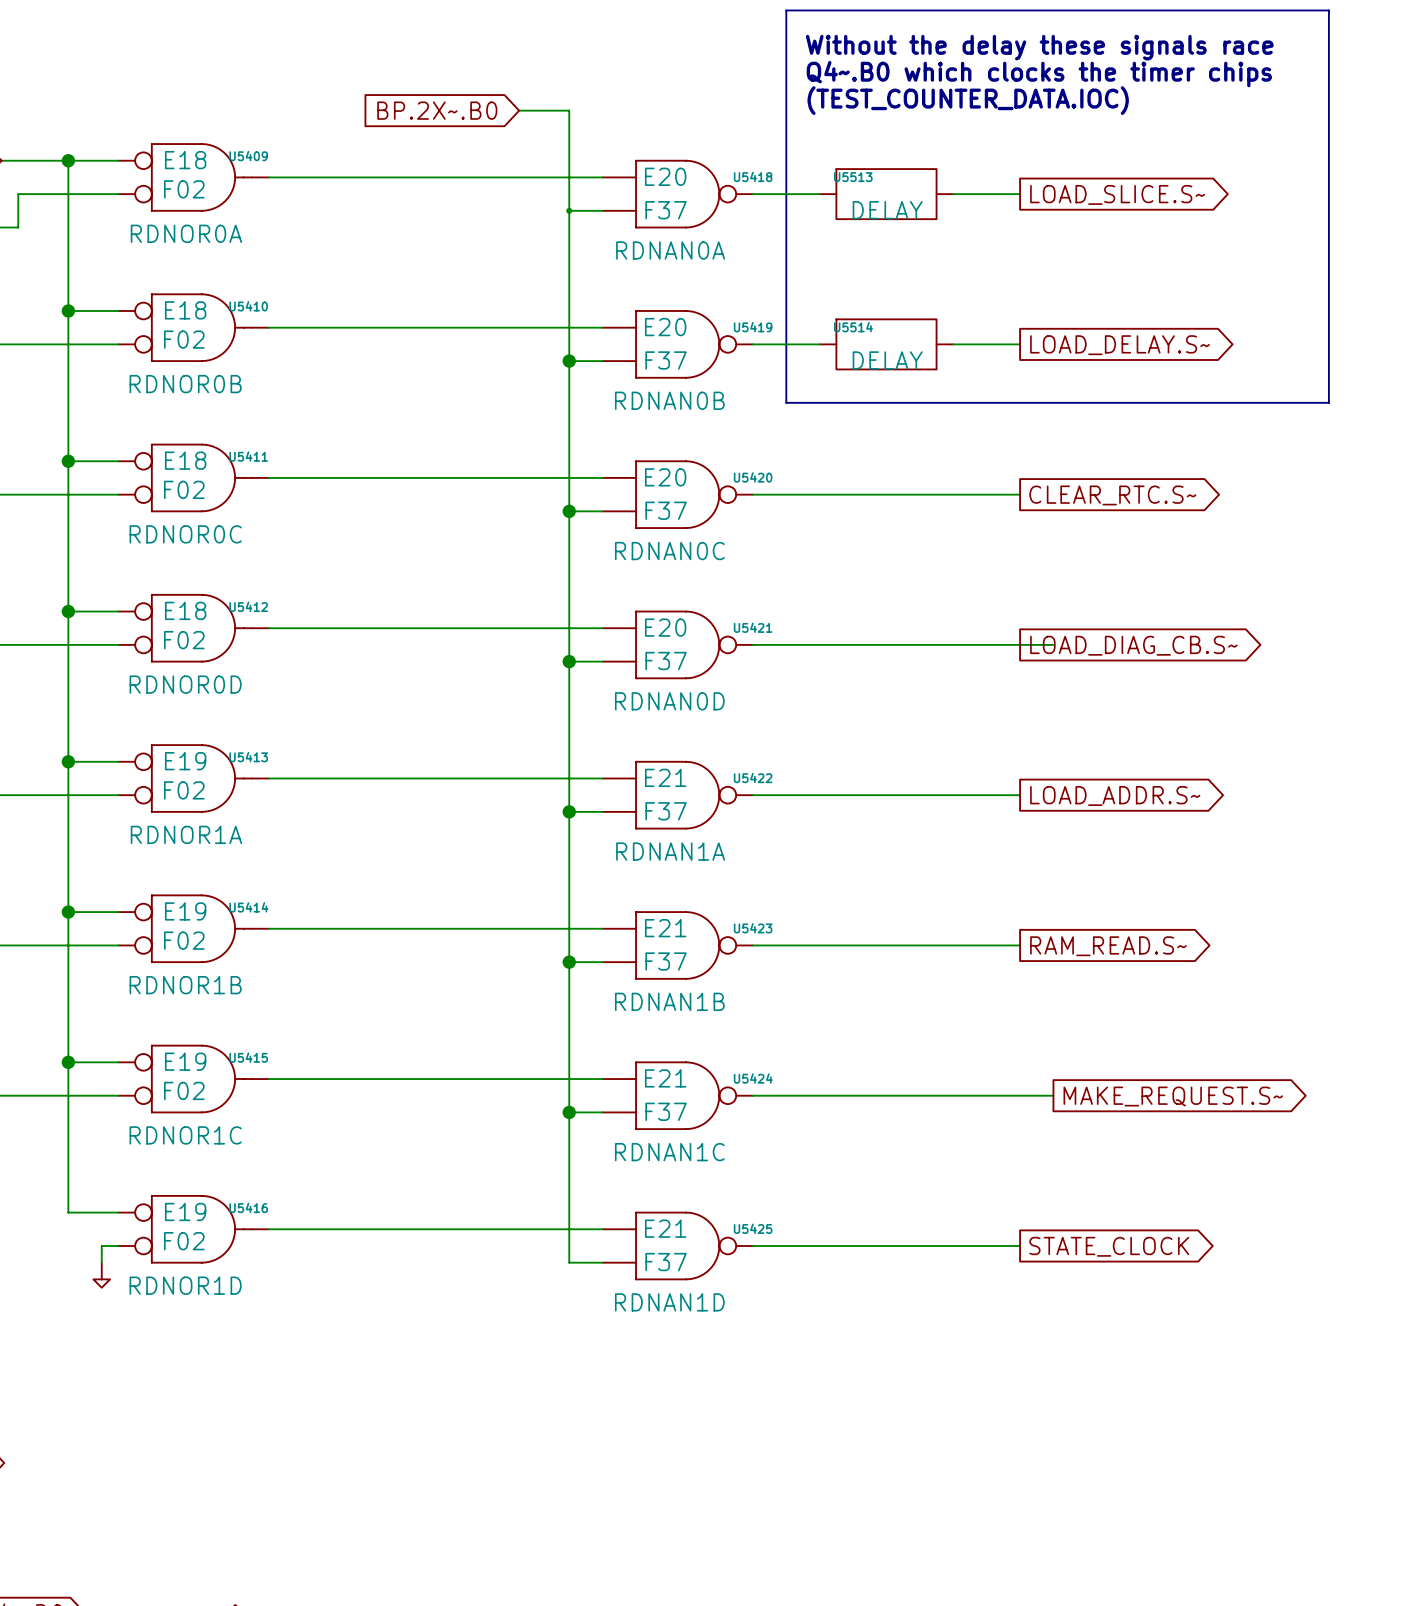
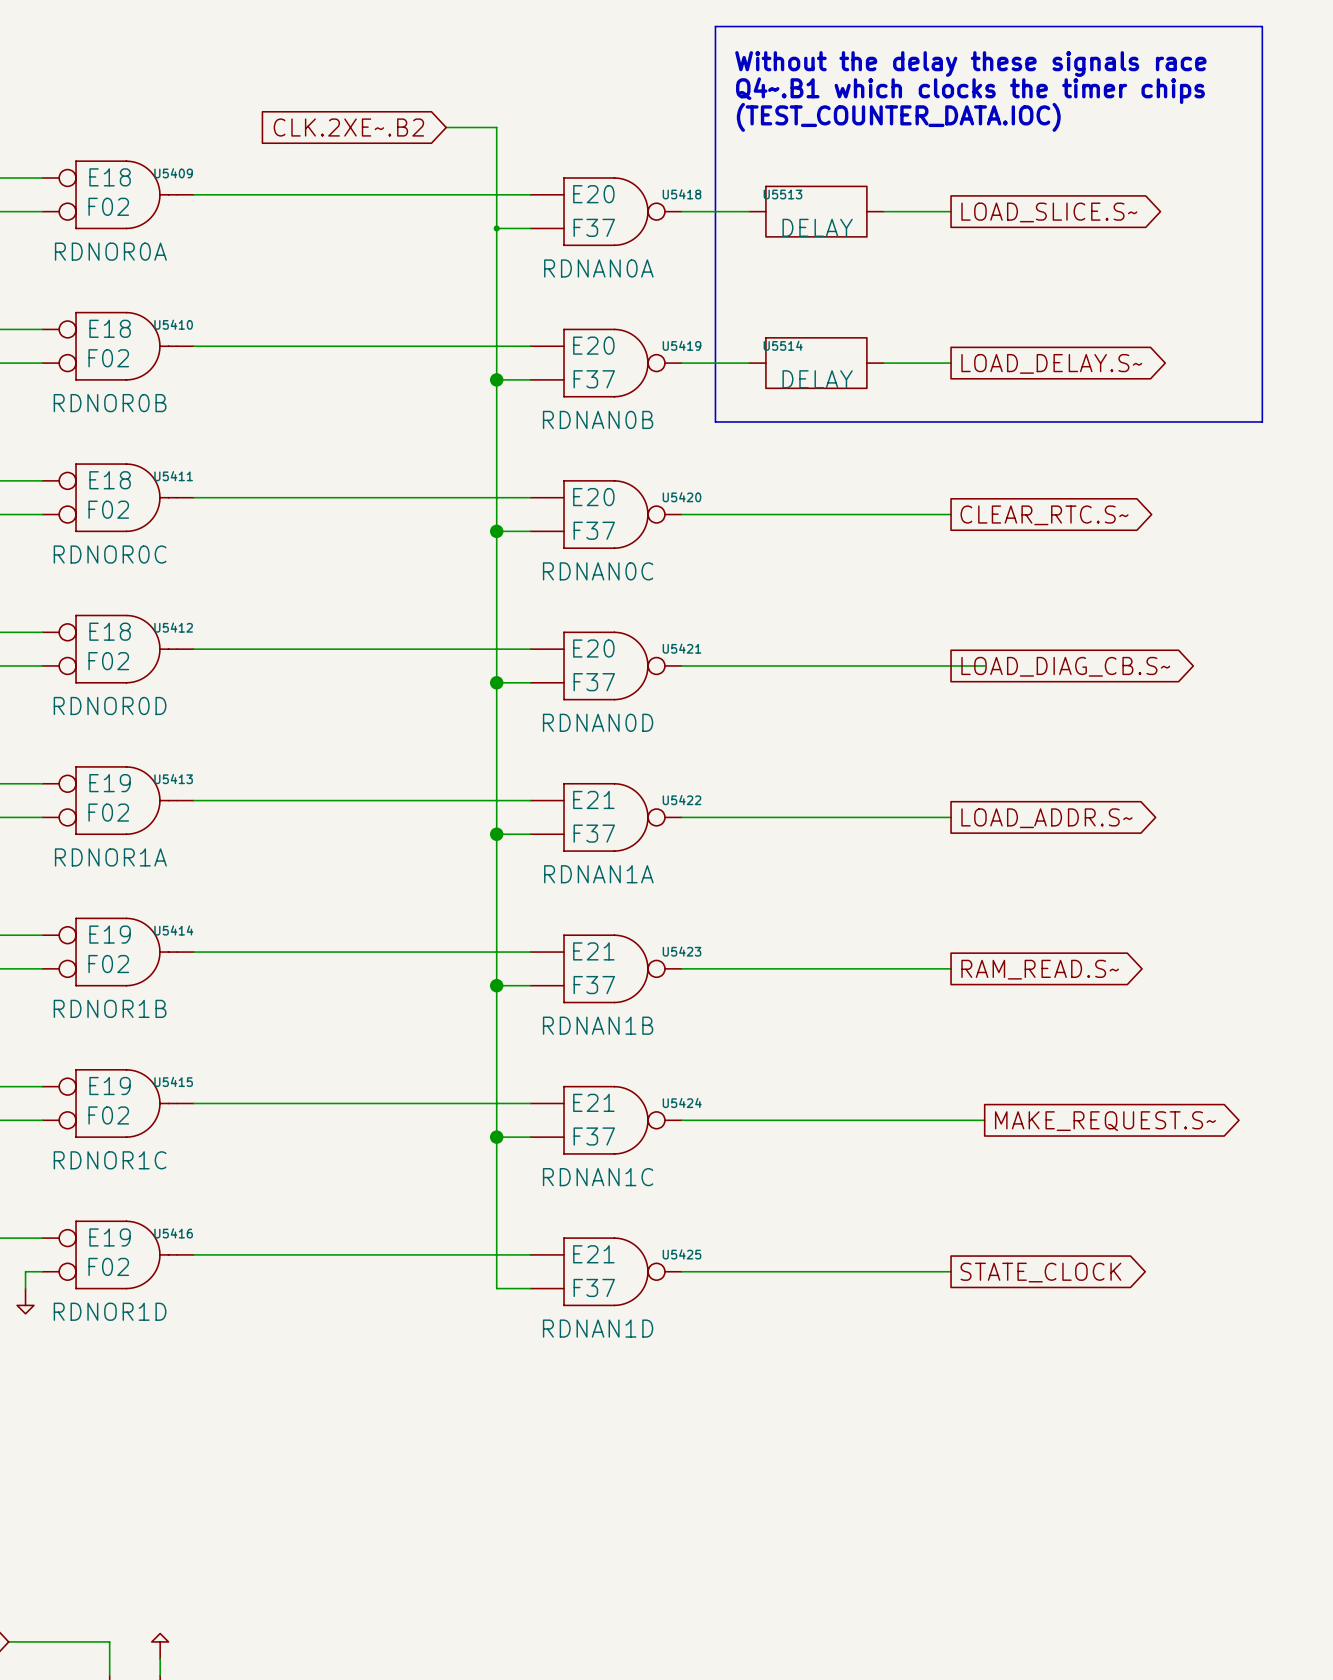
text: Q4~.B0 which clocks the timer chips (1039, 74) -> Q4~.B1 which clocks the timer chips (970, 90)
global label: BP.2X~.B0 (437, 110) -> CLK.2XE~.B2 (348, 127)

